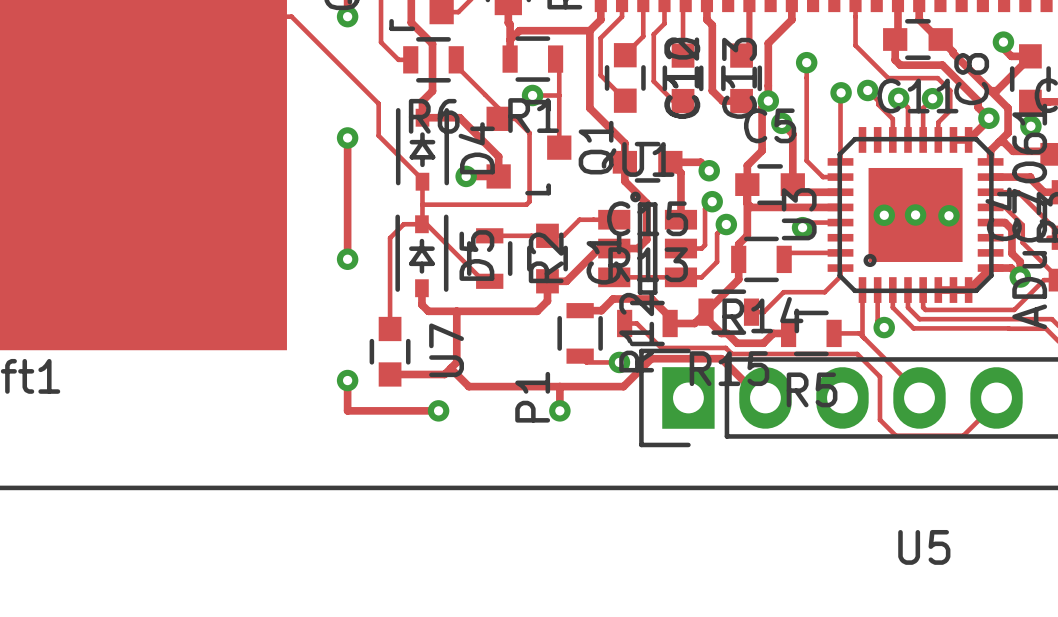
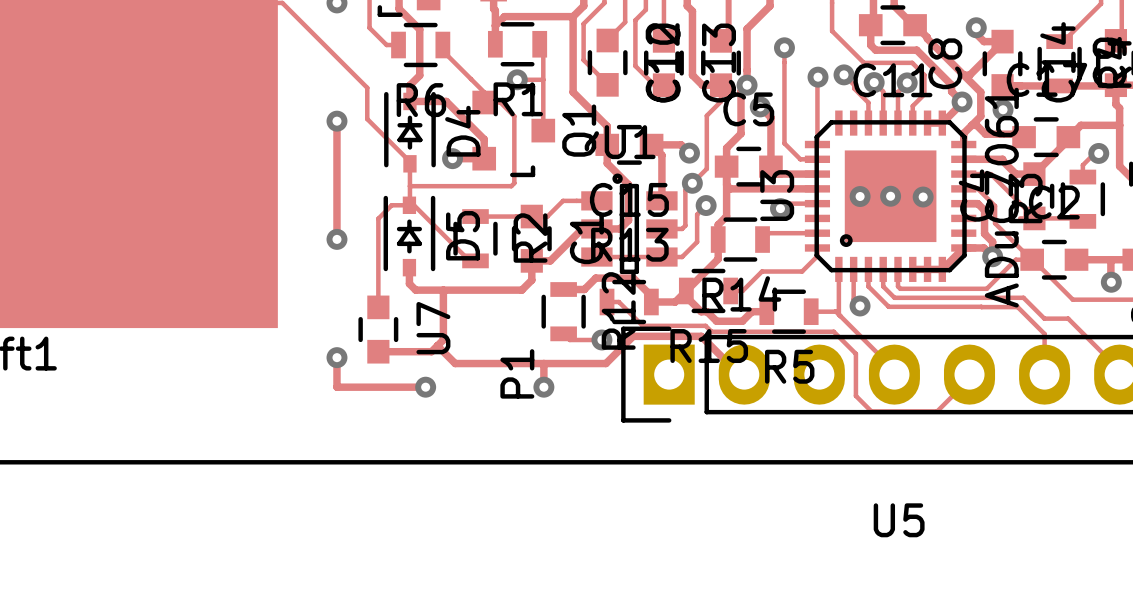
track: none -> (721, 85) (721, 101) (706, 115) (706, 168) (692, 183)

